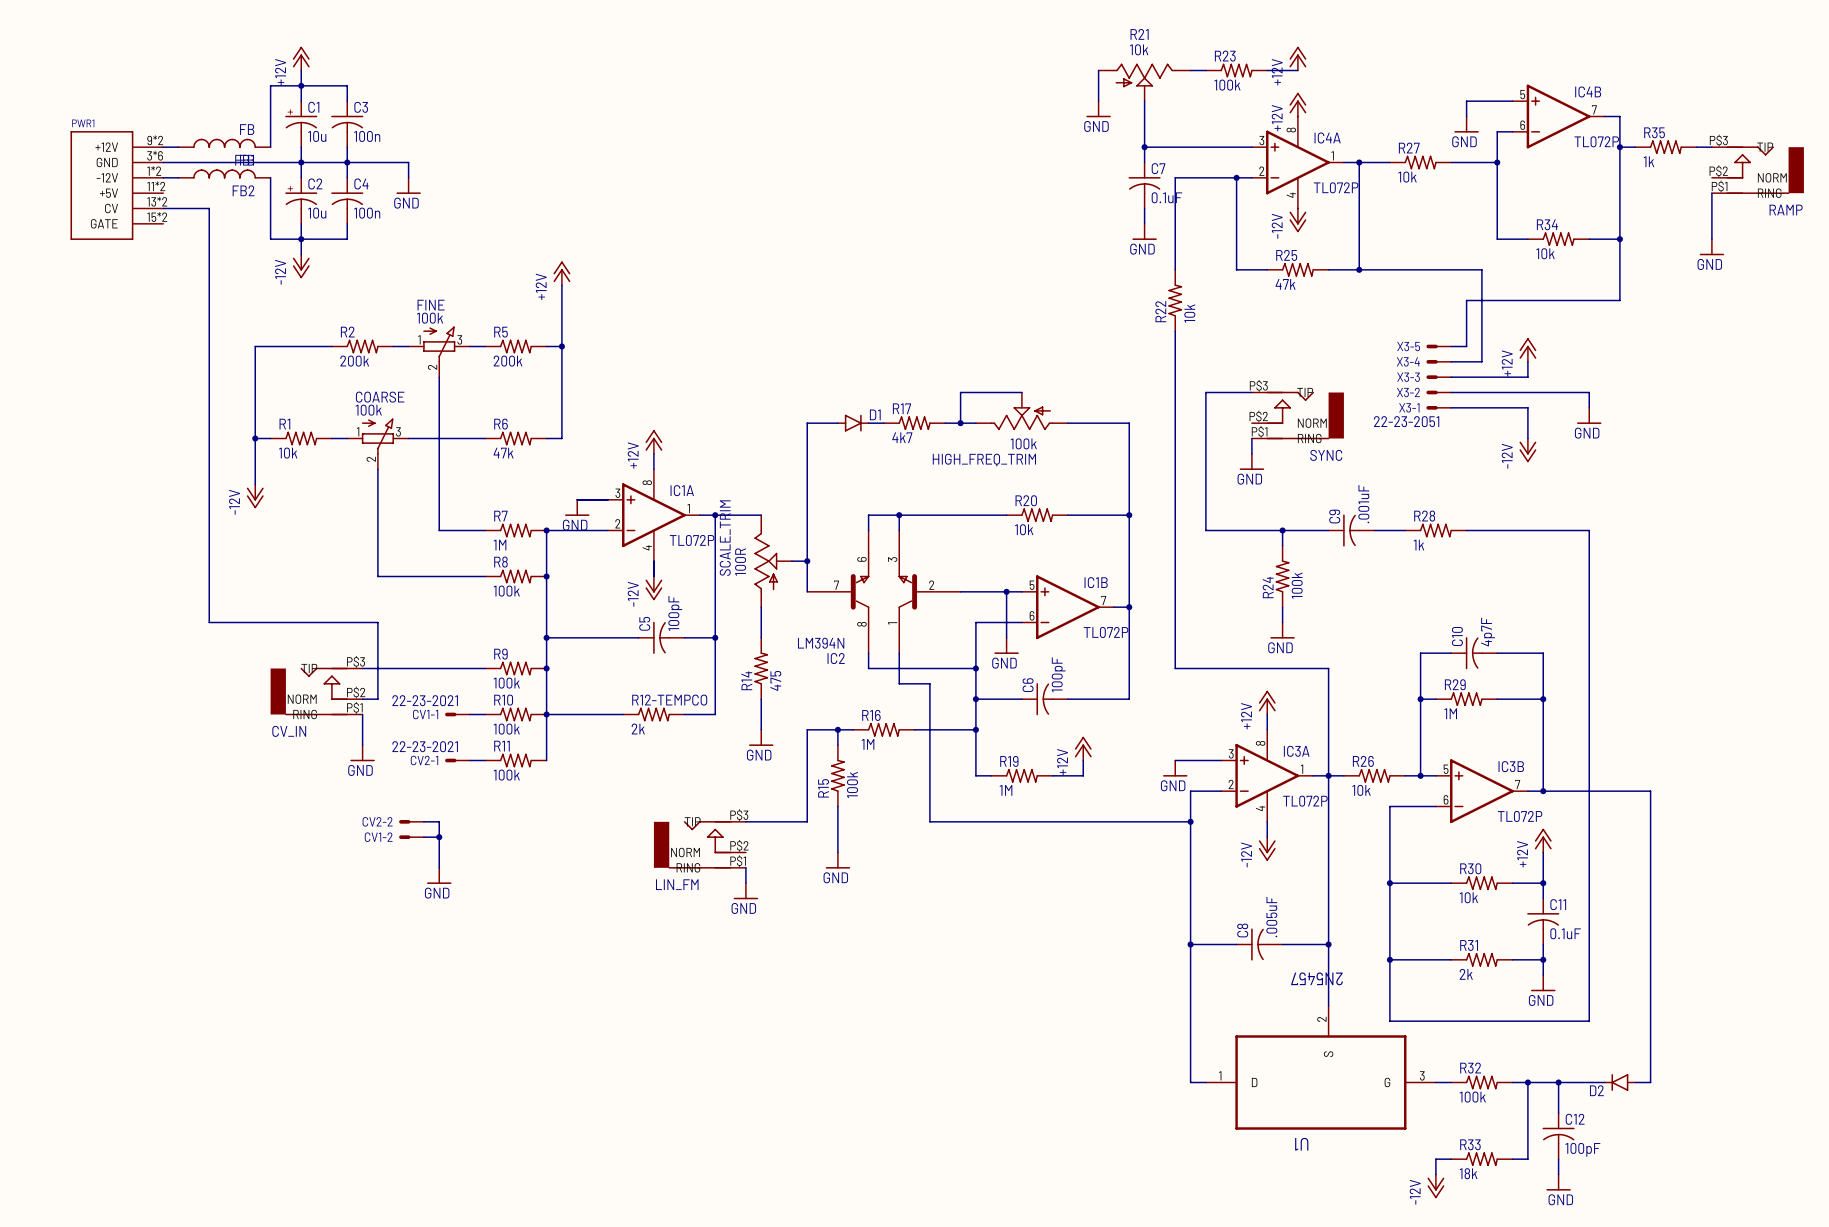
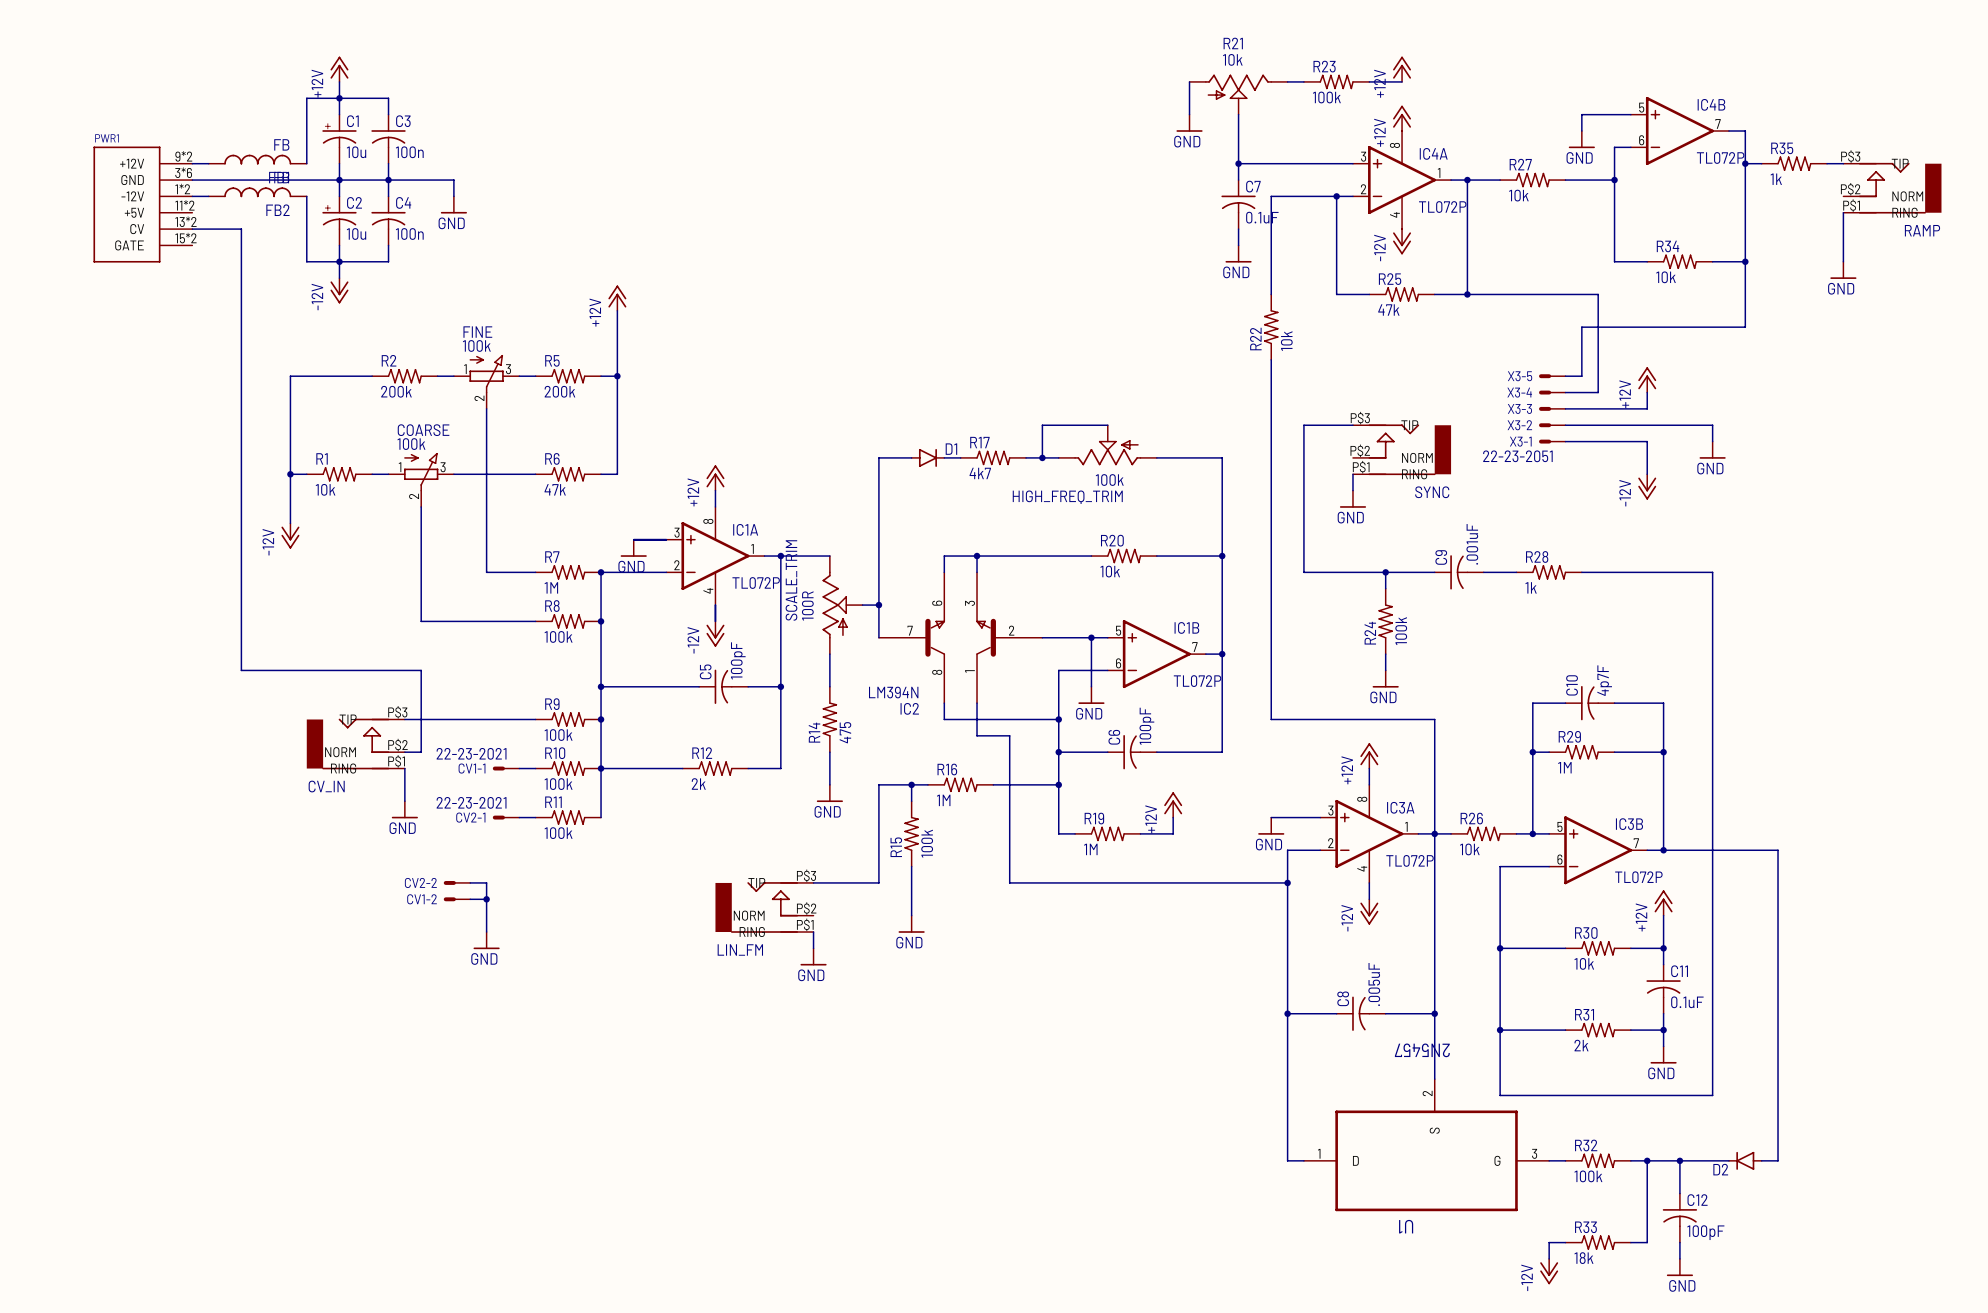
R12-TEMPCO name: R12-TEMPCO (669, 700) -> R12 (702, 753)

